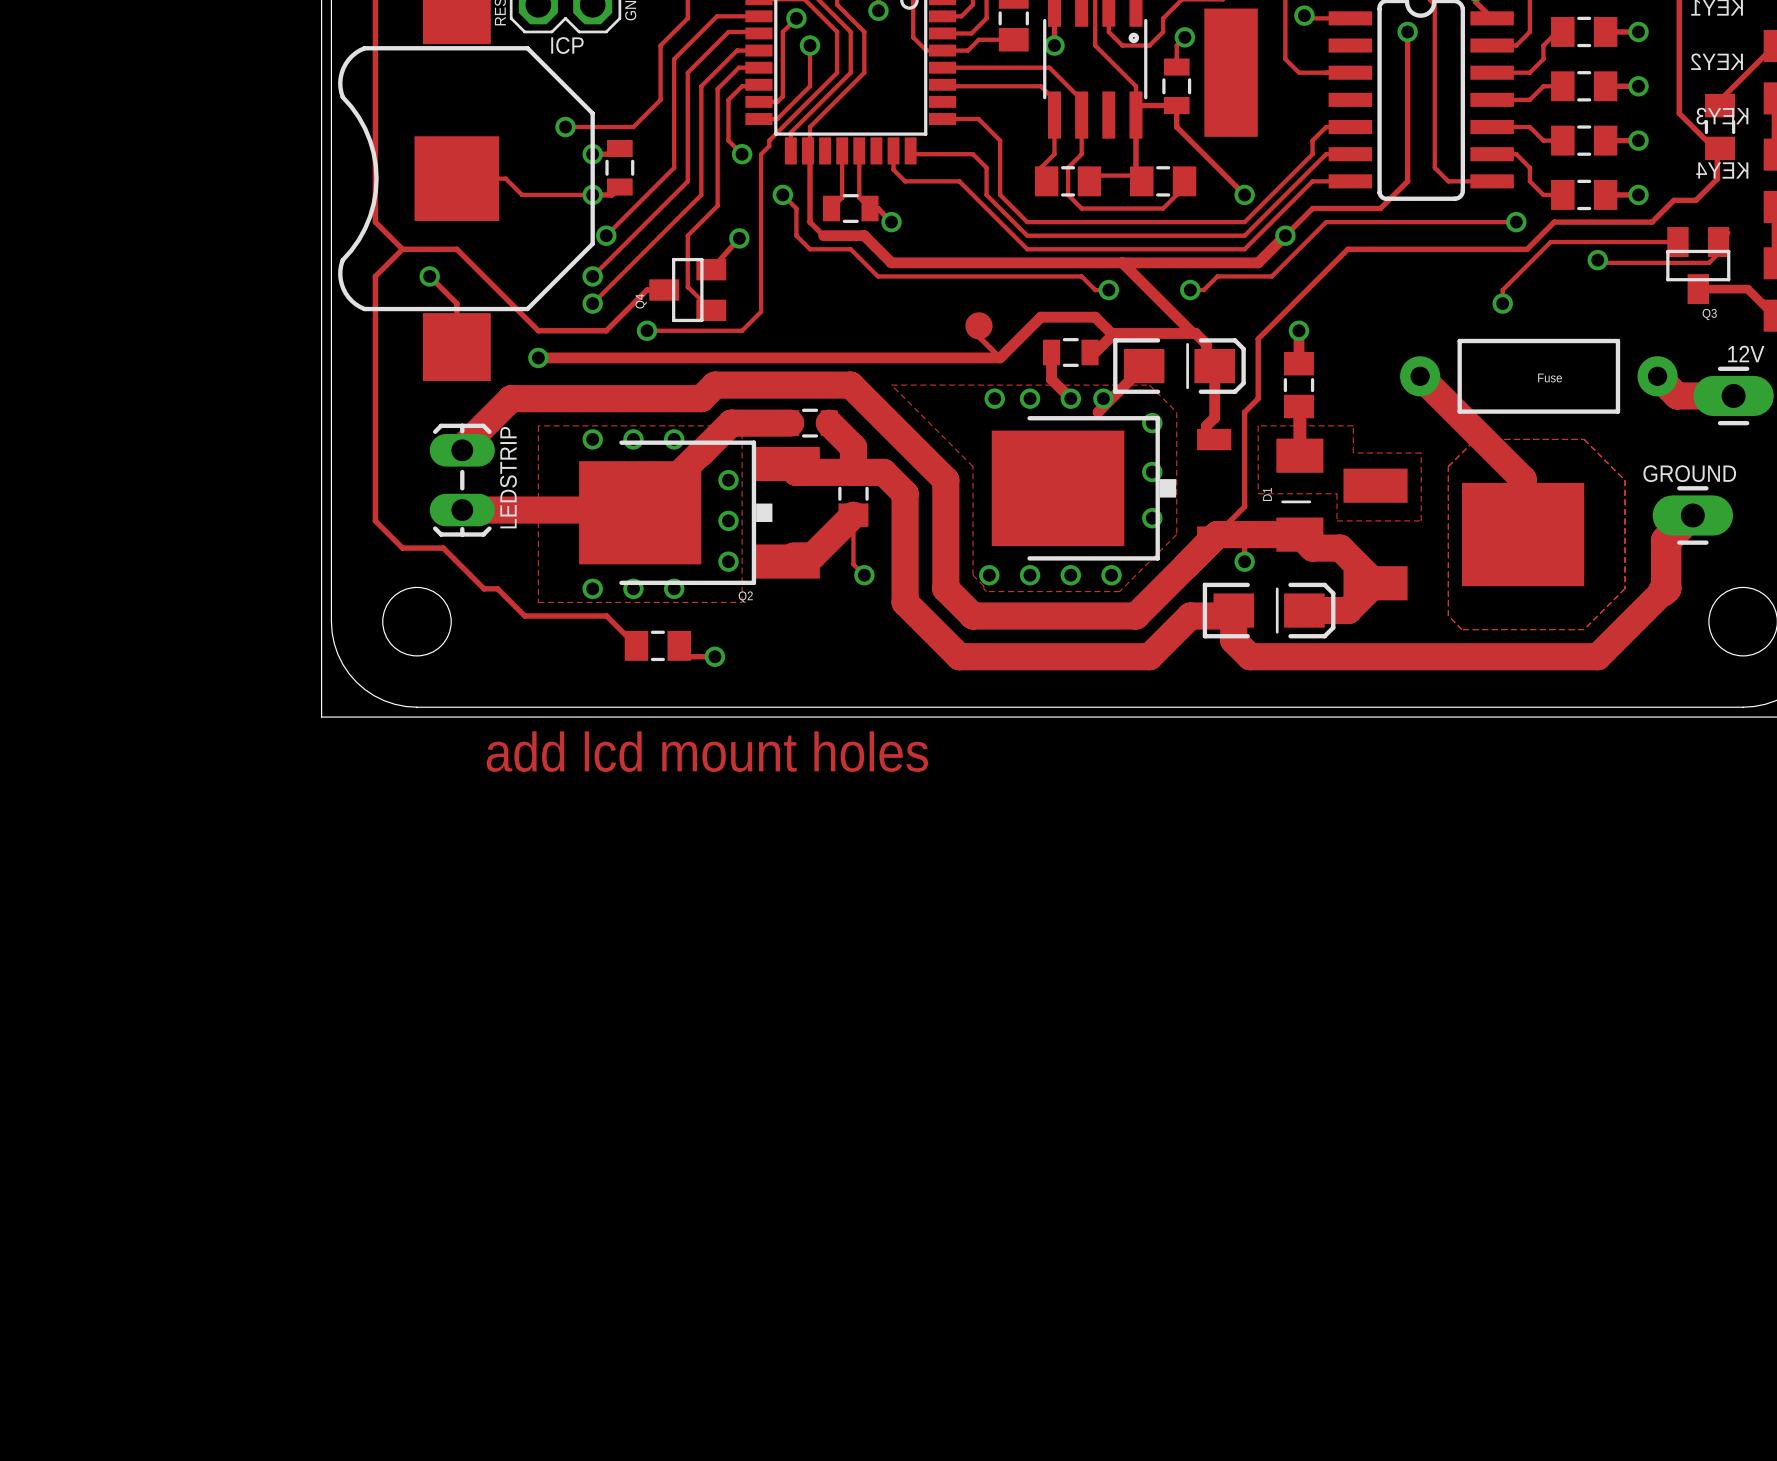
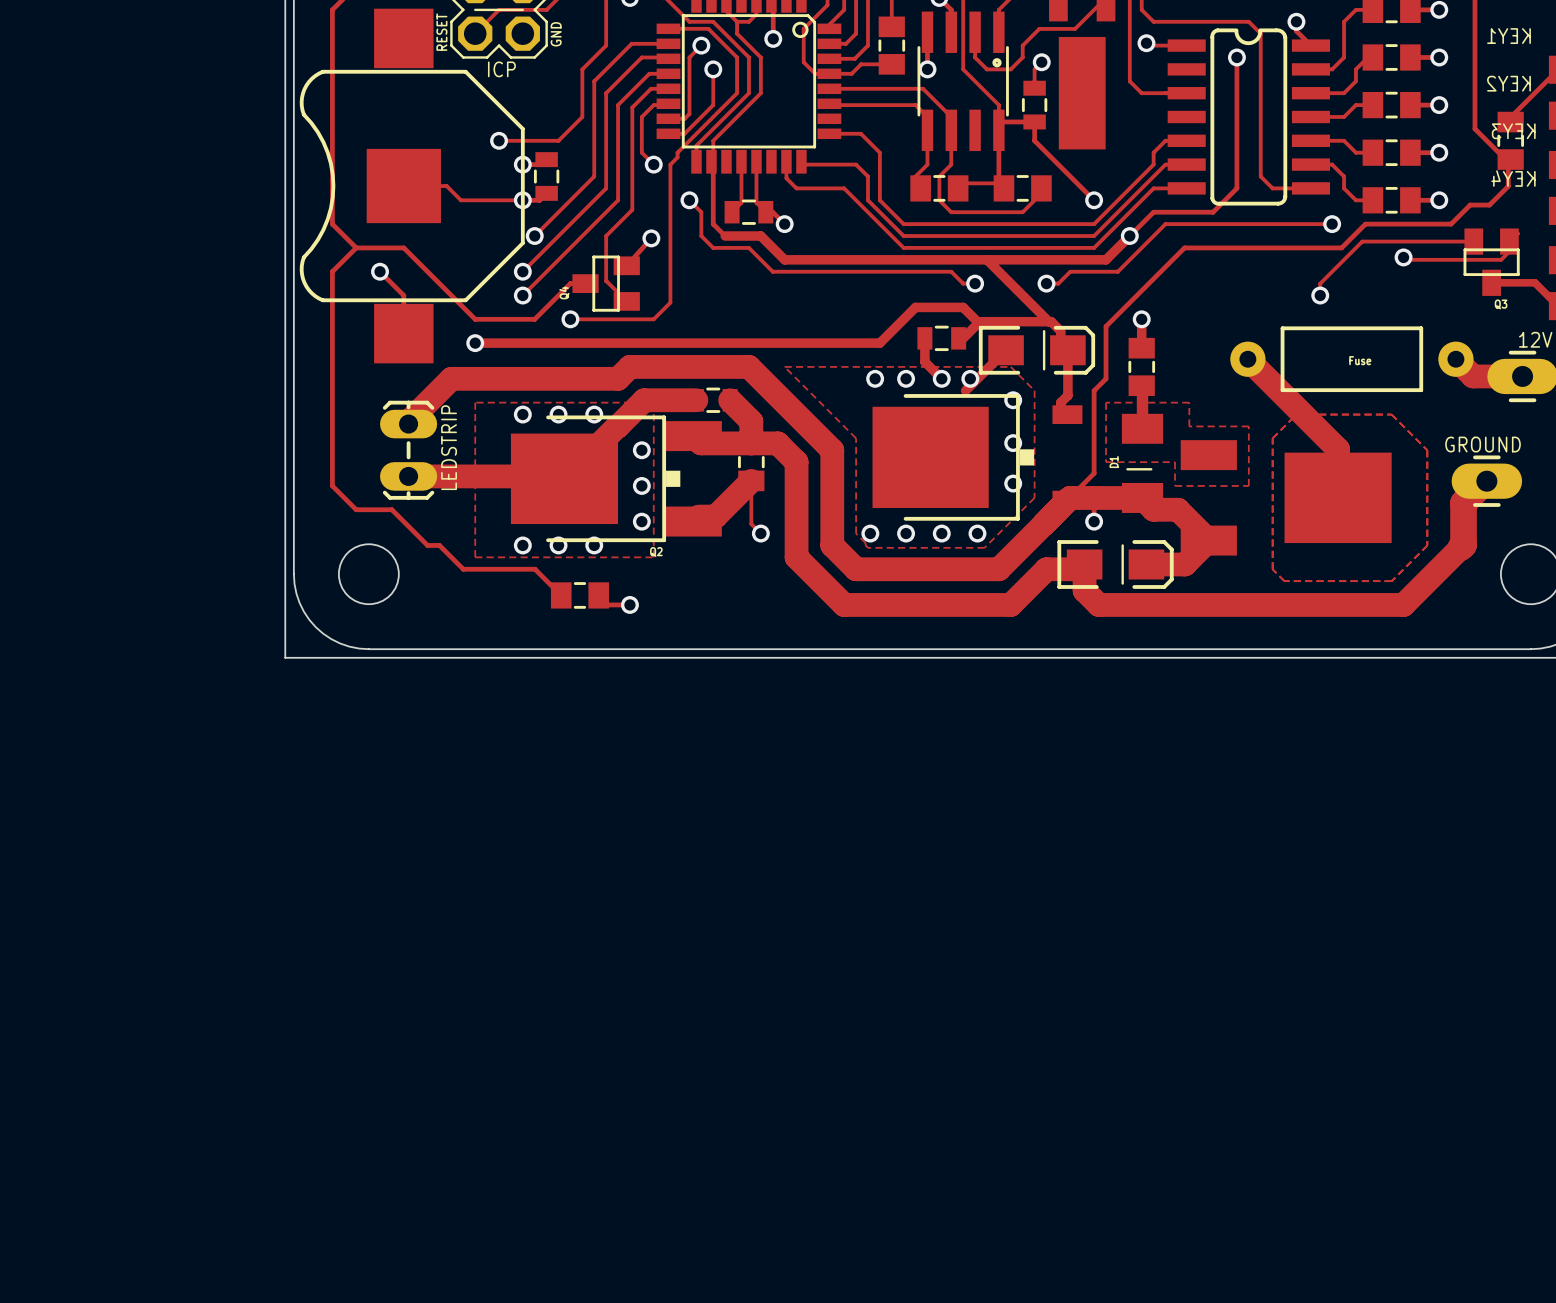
track: (978, 325) (978, 336) (1000, 357) -> none
part: (978, 325) -> none
text: add lcd mount holes (707, 751) -> none

